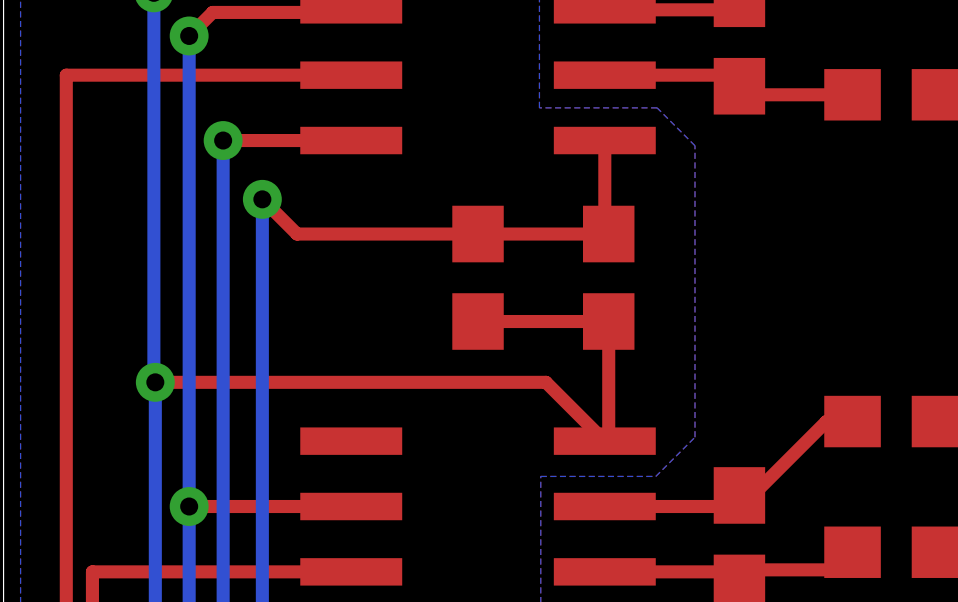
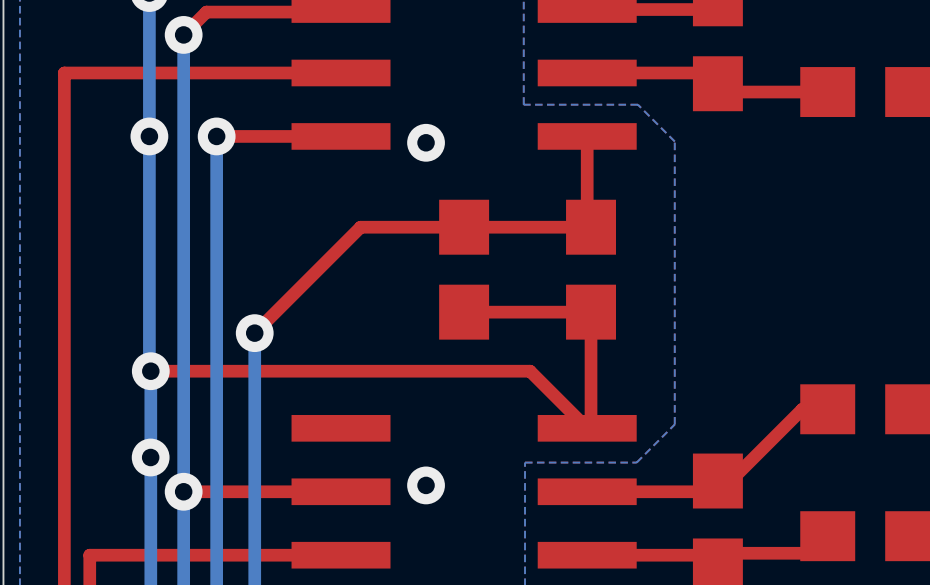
via: none -> (149, 136)
via: none -> (426, 142)
top track: (262, 199) (297, 234) (371, 234) -> (254, 333) (360, 227)
bottom track: (262, 199) (262, 343) -> none
via: (262, 199) -> none
via: none -> (254, 333)
via: none -> (150, 457)
via: none -> (426, 485)

